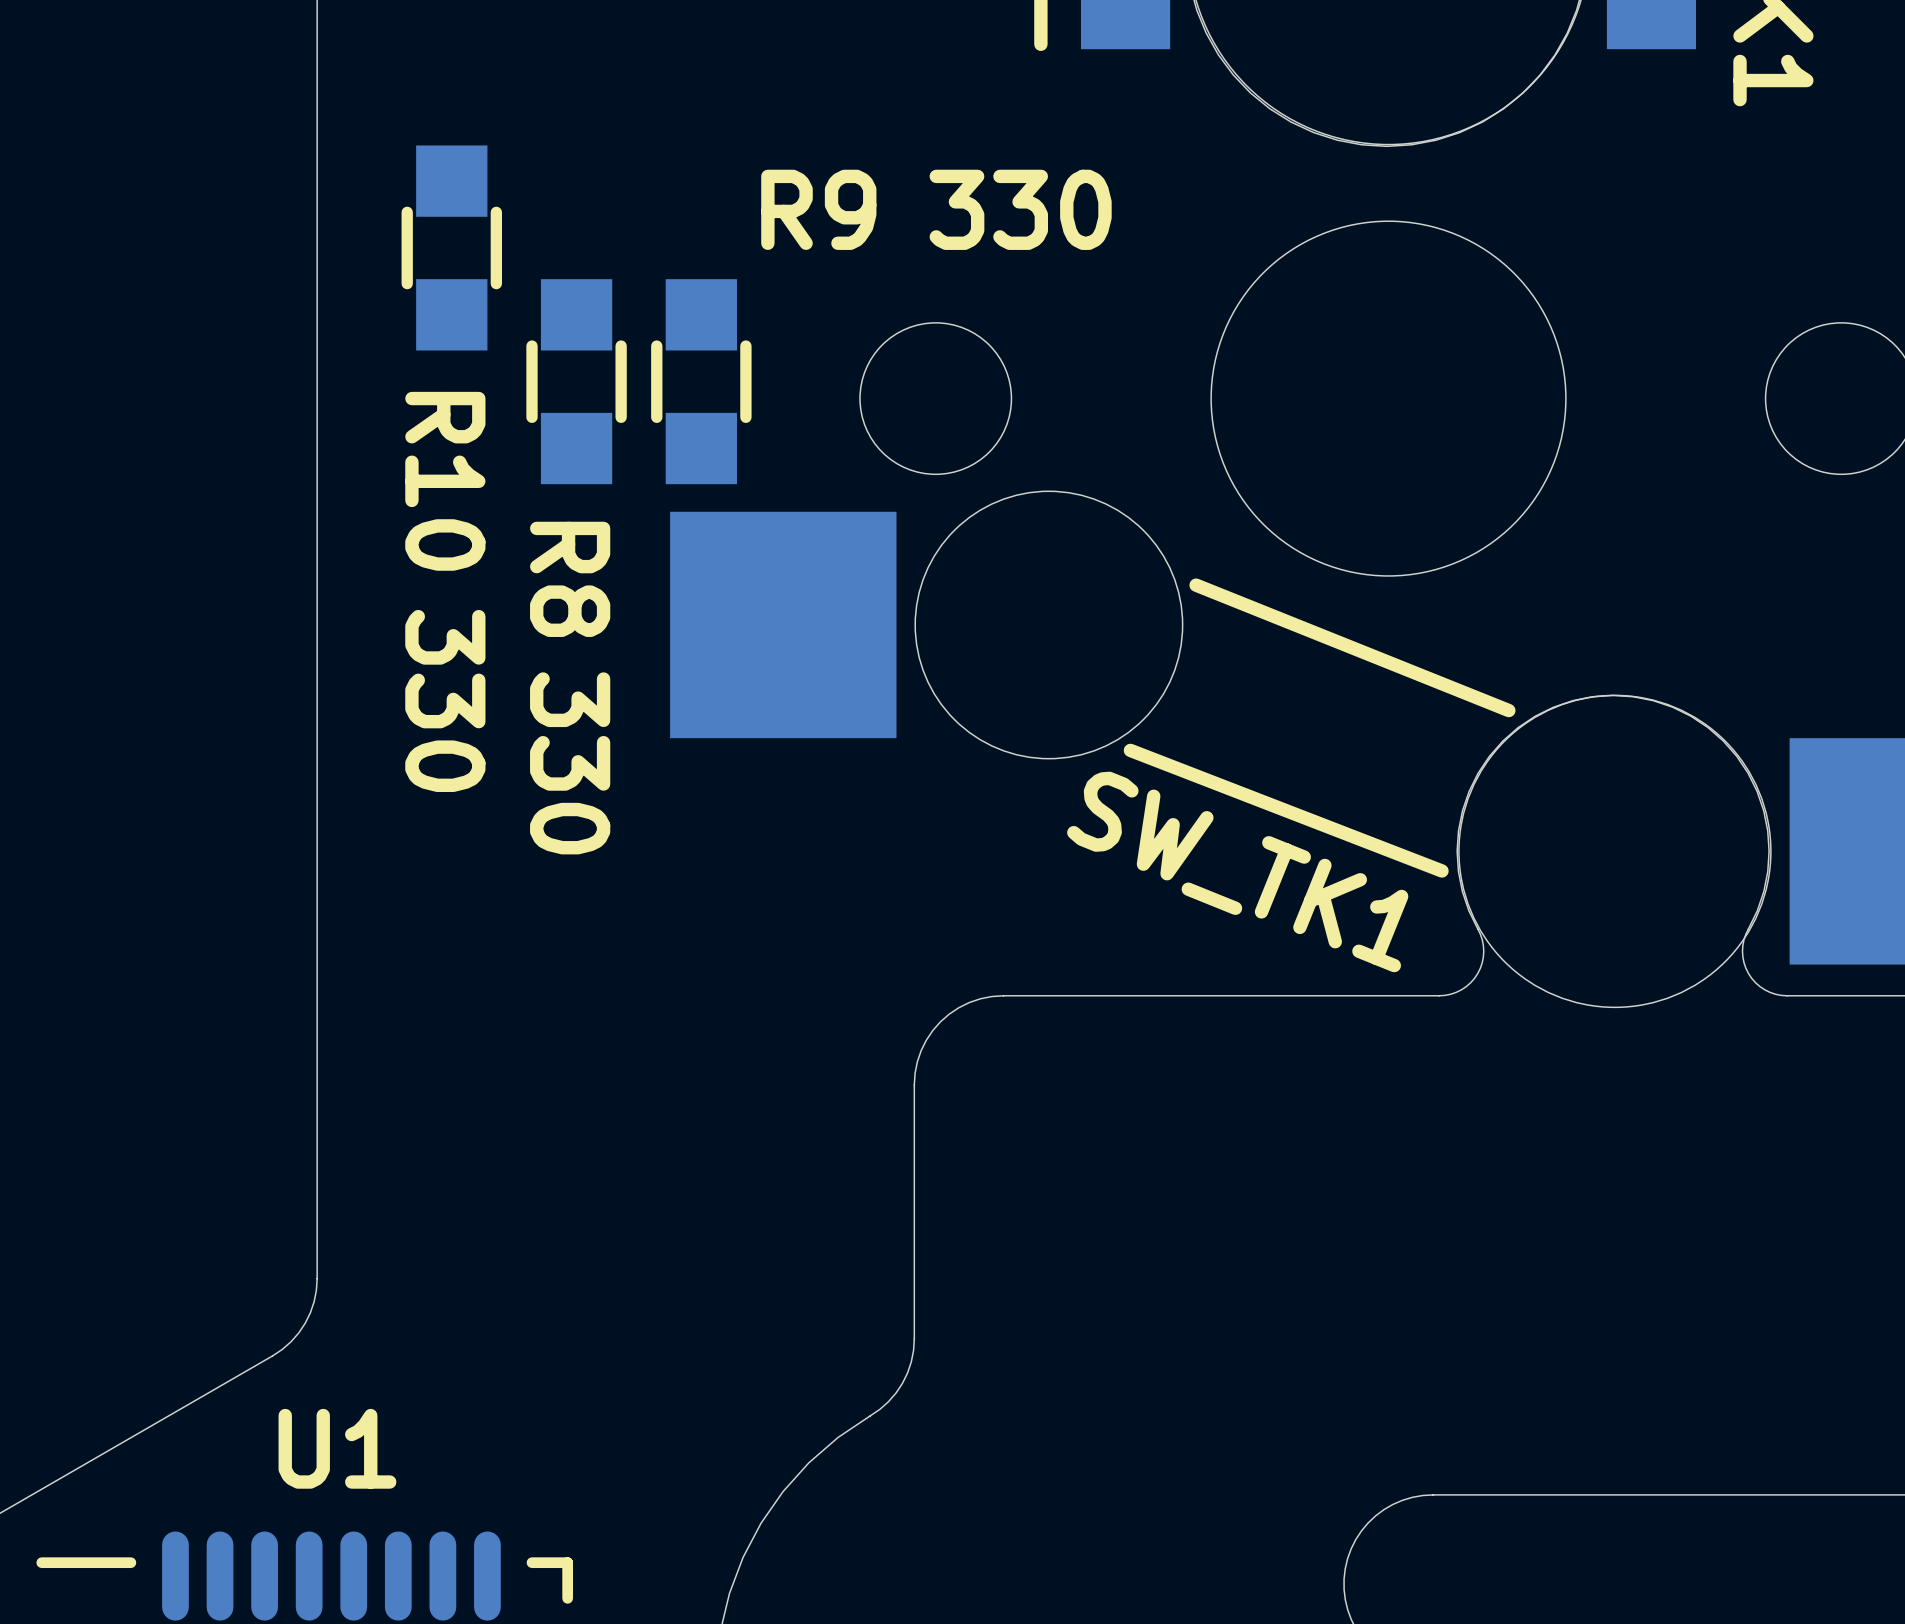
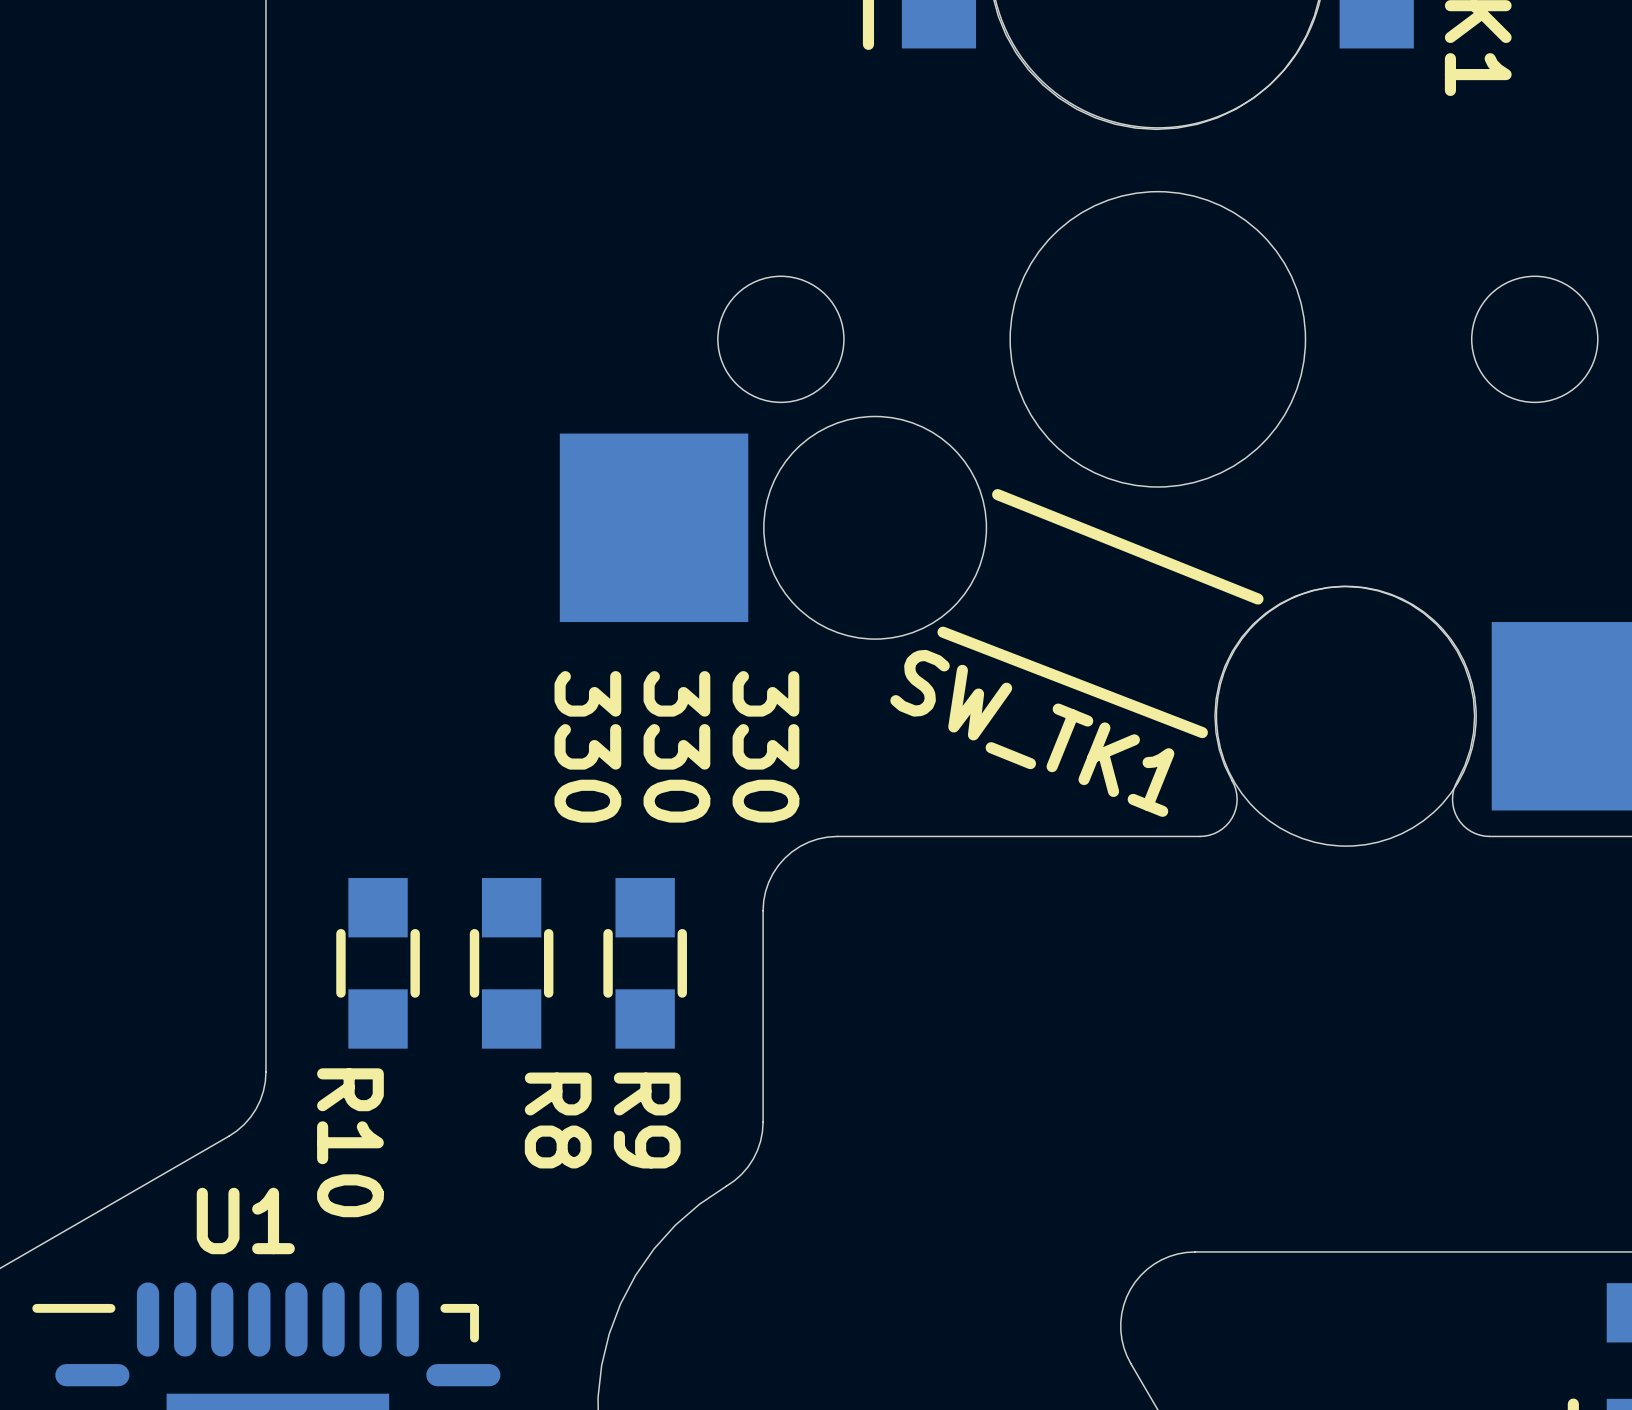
R9 name rotation: 0° (818, 209) -> 90° clockwise (647, 1120)
R9 name position: R9 (818, 209) -> R9 (647, 1120)
R9 value rotation: 0° (1020, 209) -> 90° clockwise (765, 746)
R10 position: (451, 247) -> (378, 963)
R8 position: (576, 381) -> (511, 963)
R9 position: (701, 381) -> (645, 963)
R10 name position: R10 (445, 481) -> R10 (350, 1142)
R8 name position: R8 (570, 579) -> R8 (558, 1120)
R10 value position: 330 (445, 700) -> 330 (587, 746)
R8 value position: 330 (570, 763) -> 330 (676, 746)
U1 name position: U1 (337, 1448) -> U1 (245, 1220)

